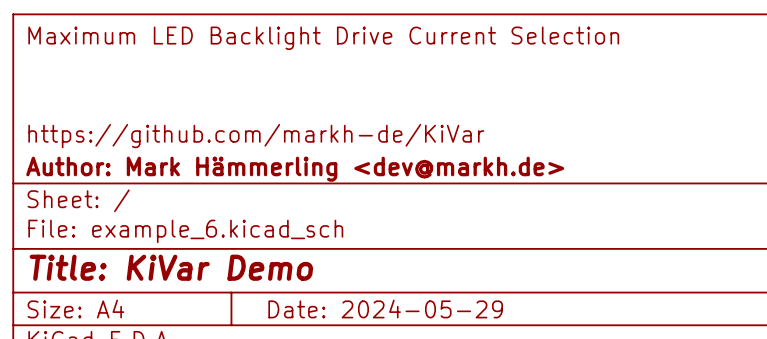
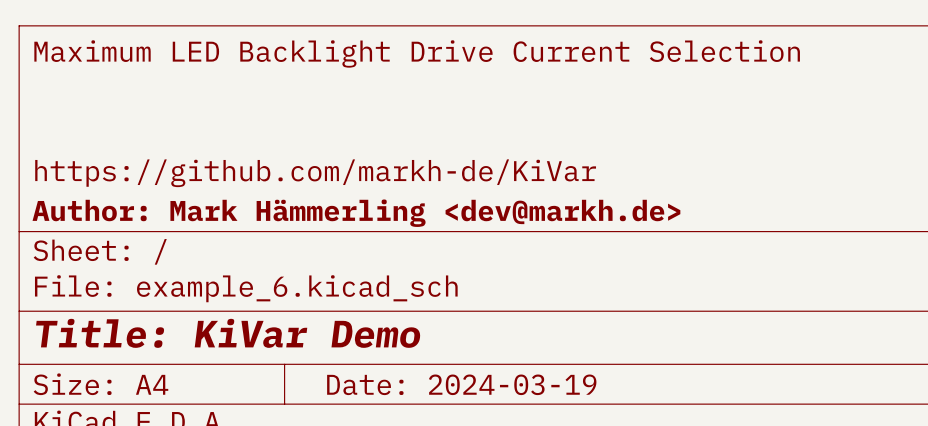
title block: Date: 2024-05-29 (385, 309) -> Date: 2024-03-19 (461, 384)

